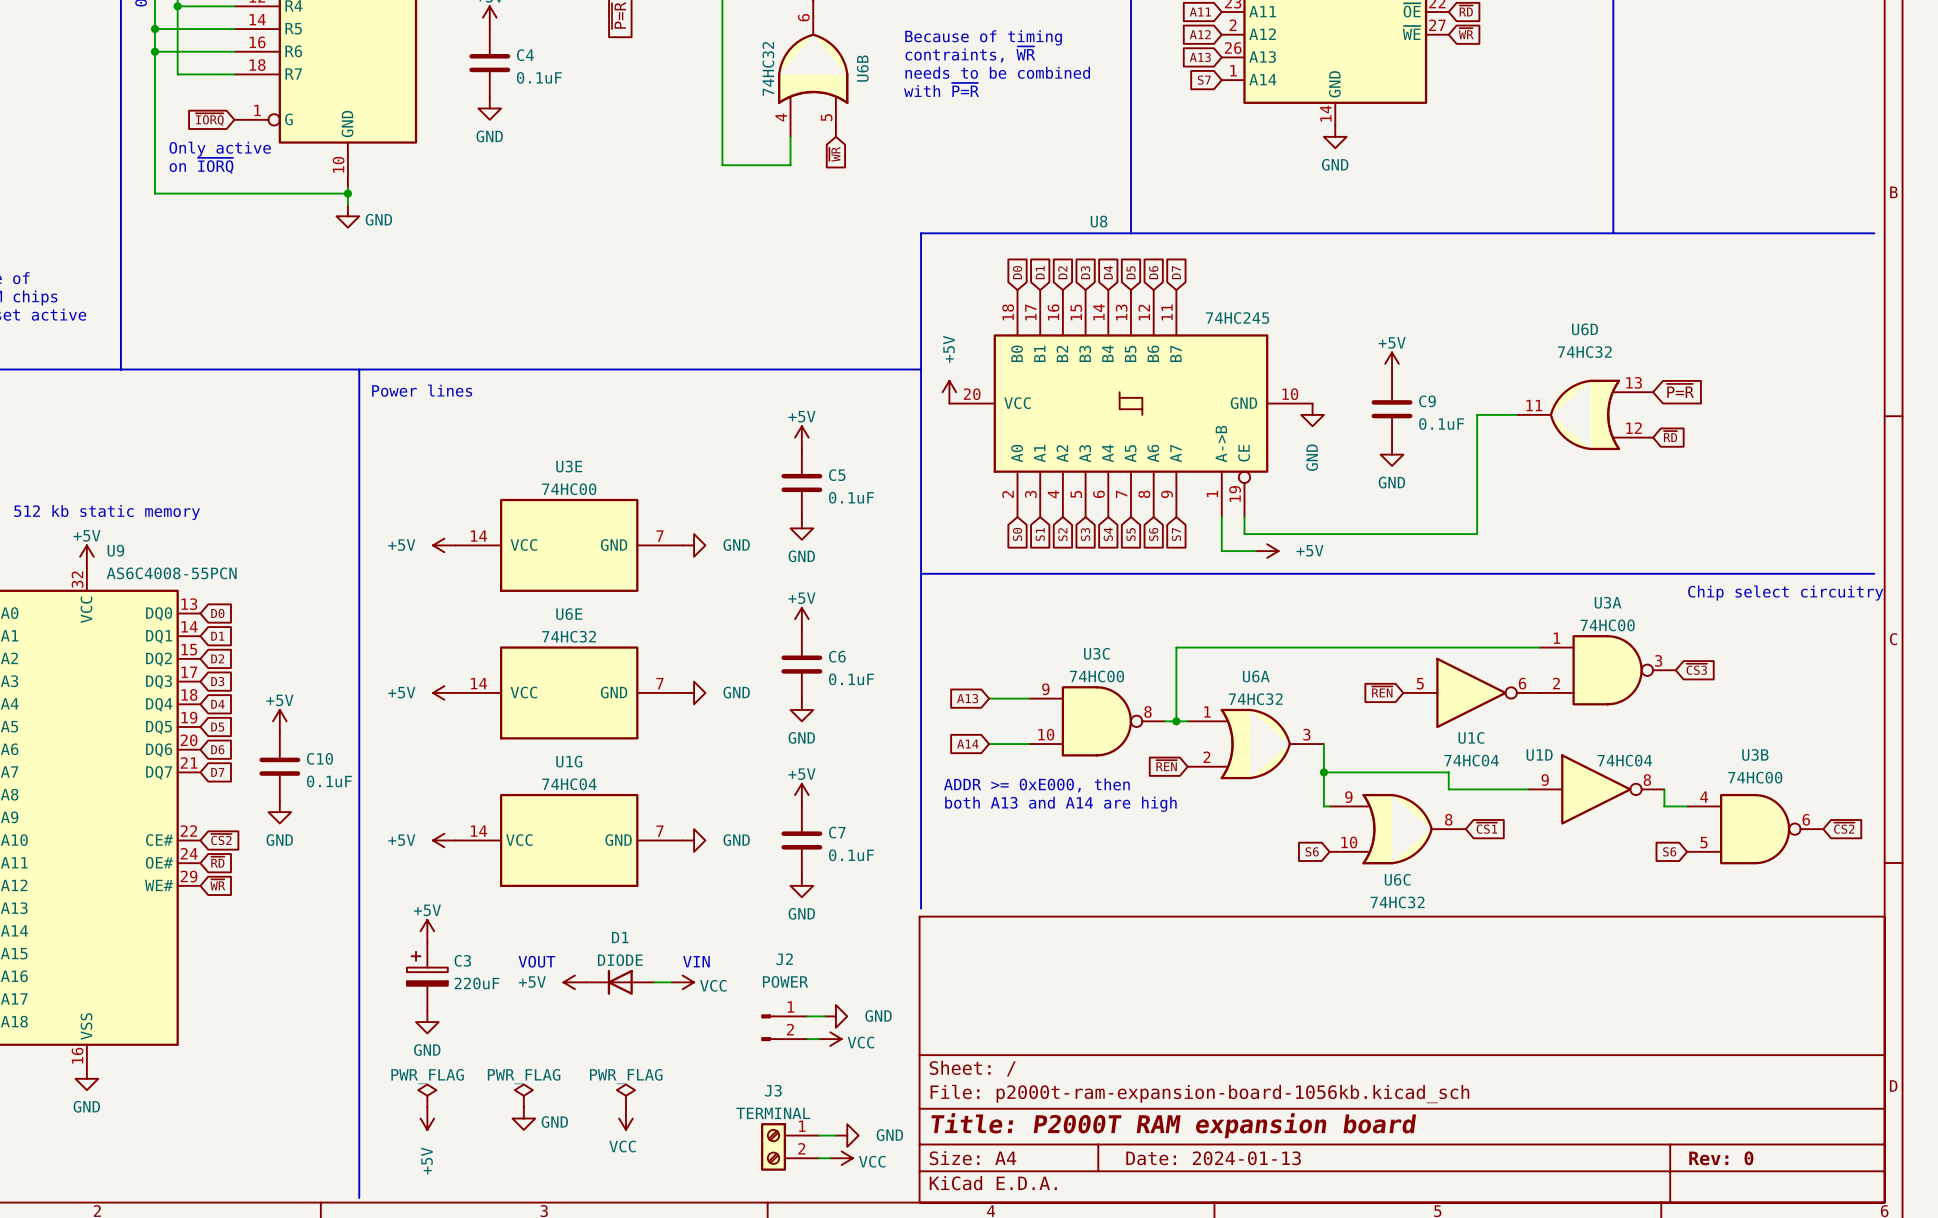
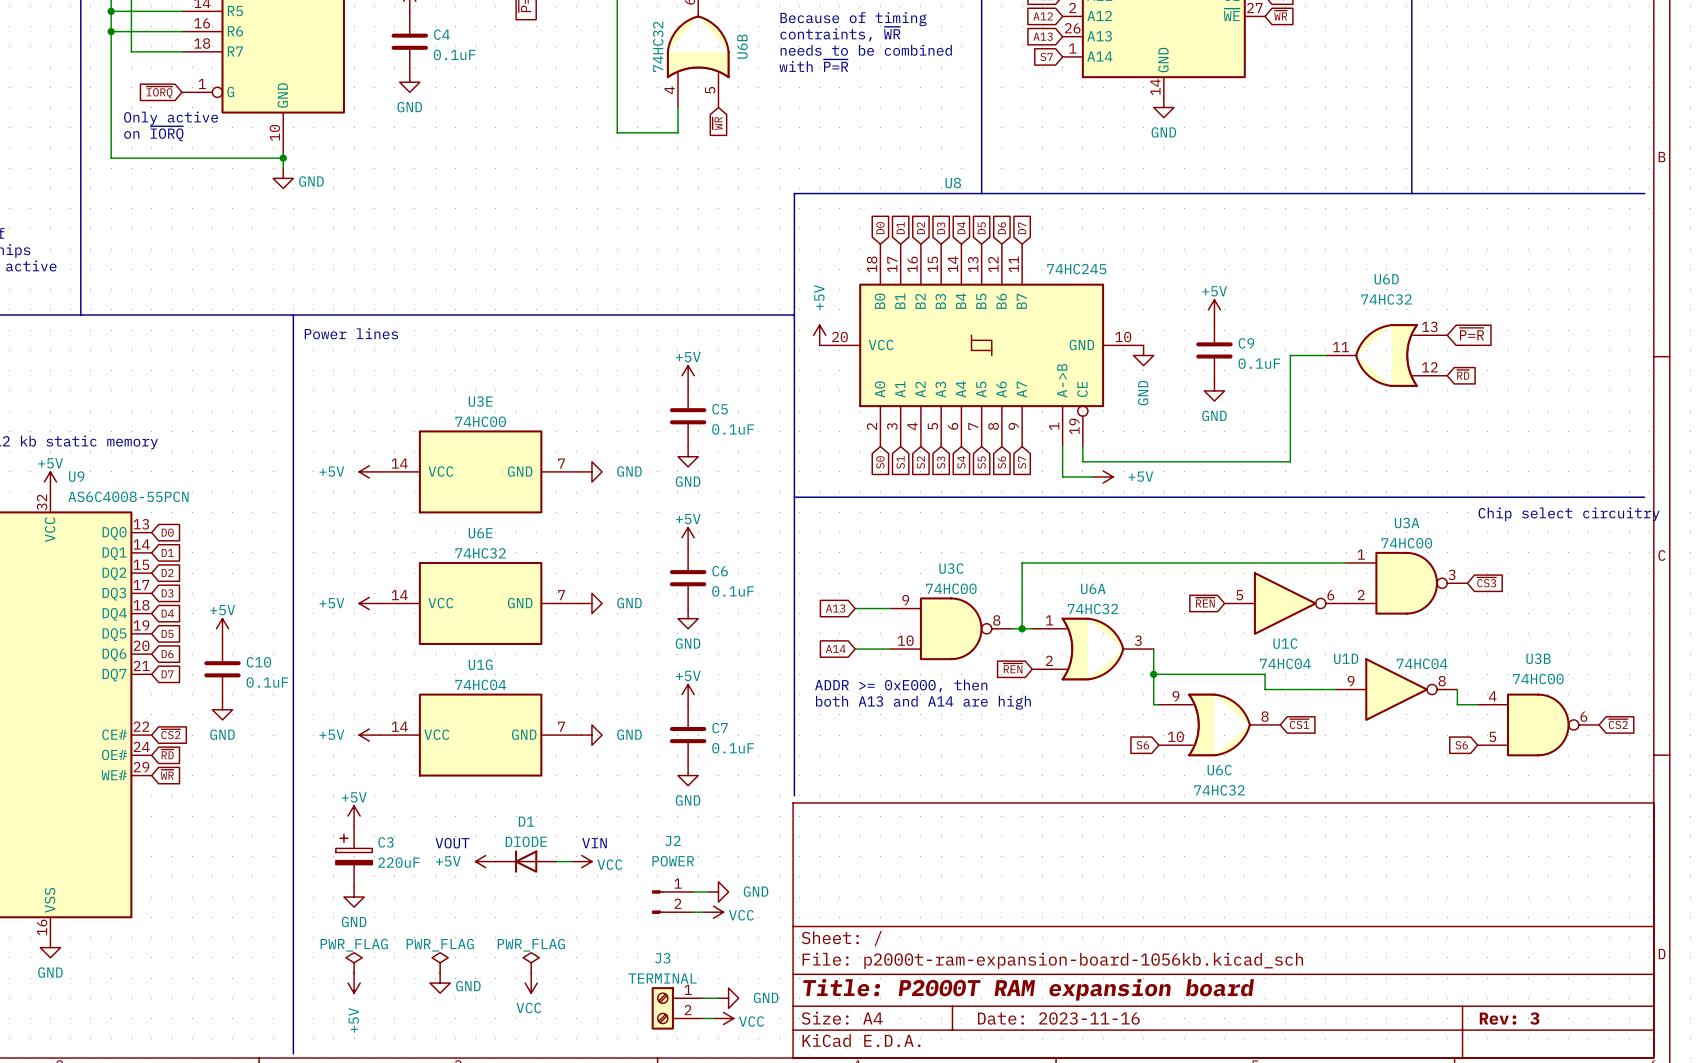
title block: Date: 2024-01-13 (1213, 1158) -> Date: 2023-11-16 (1058, 1018)
title block: Rev: 0 (1721, 1158) -> Rev: 3 (1509, 1018)

